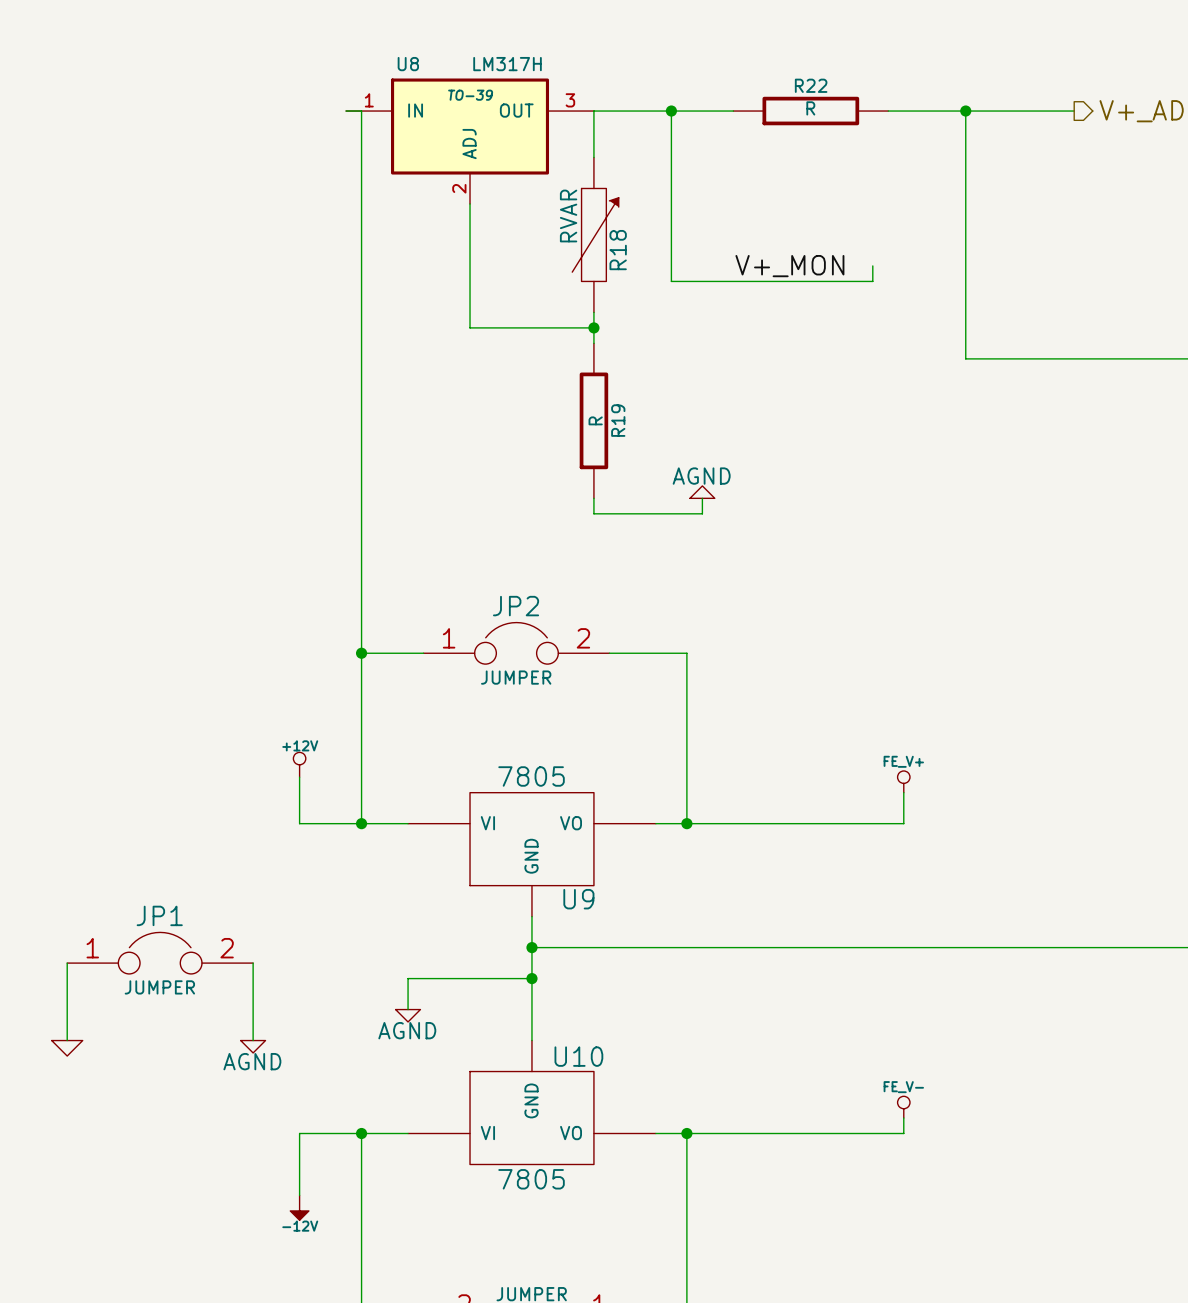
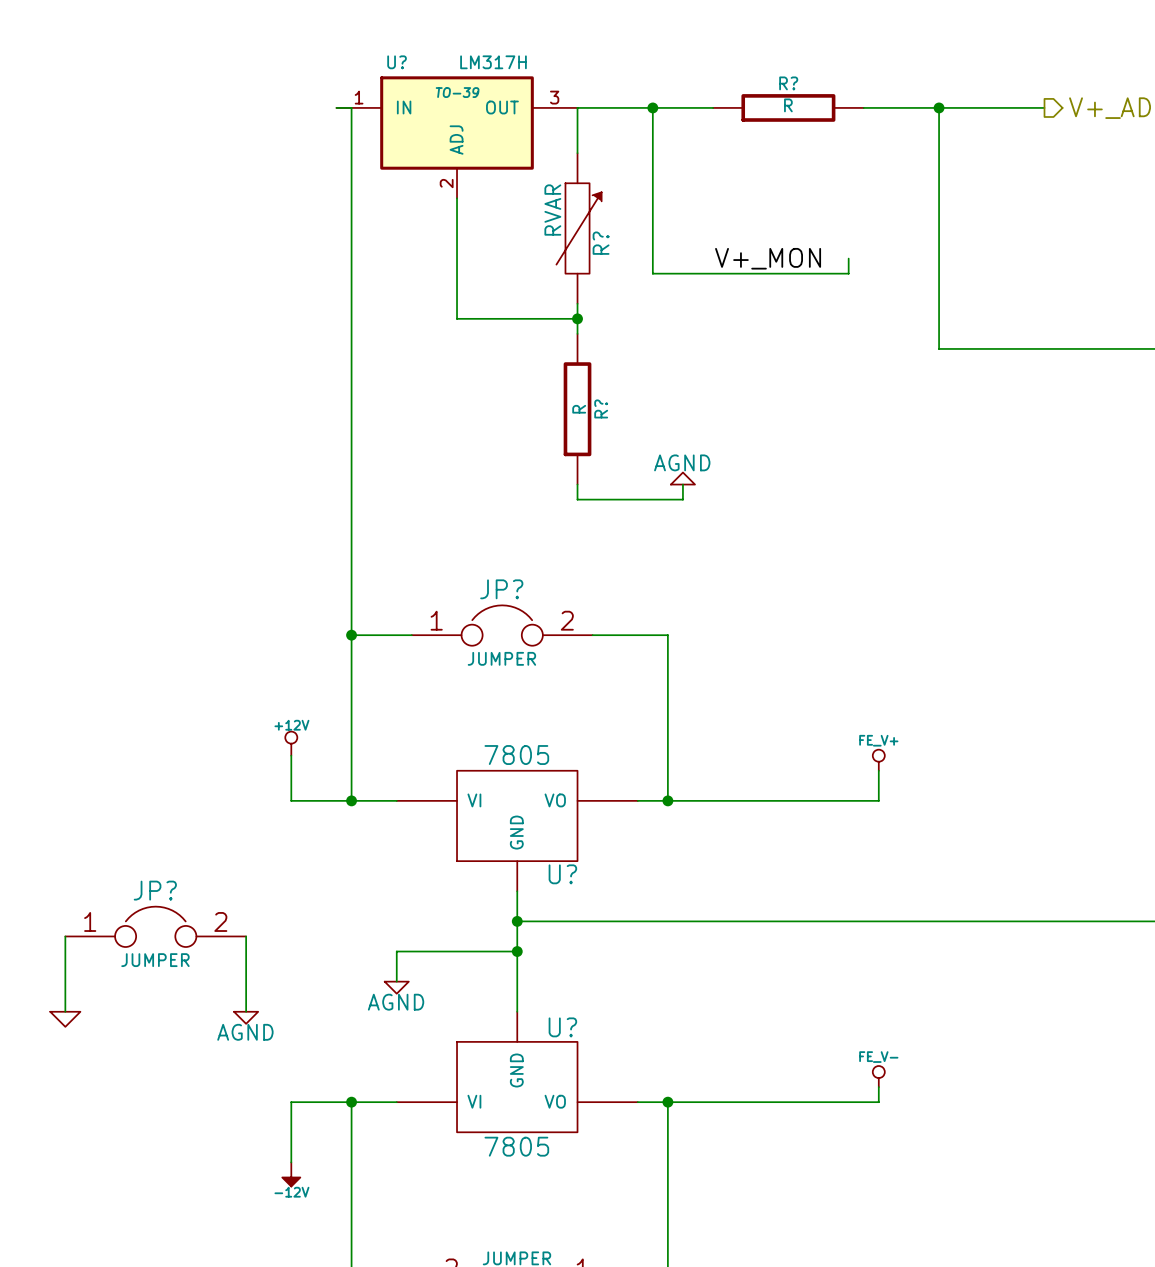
U8 name: U8 (408, 64) -> U? (397, 62)
R22 name: R22 (811, 85) -> R? (788, 83)
R18 name: R18 (618, 250) -> R? (601, 243)
R19 name: R19 (618, 420) -> R? (601, 408)
JP2 name: JP2 (516, 606) -> JP? (501, 589)
U9 name: U9 (578, 899) -> U? (562, 874)
JP1 name: JP1 (159, 915) -> JP? (155, 890)
U10 name: U10 (578, 1056) -> U? (562, 1027)

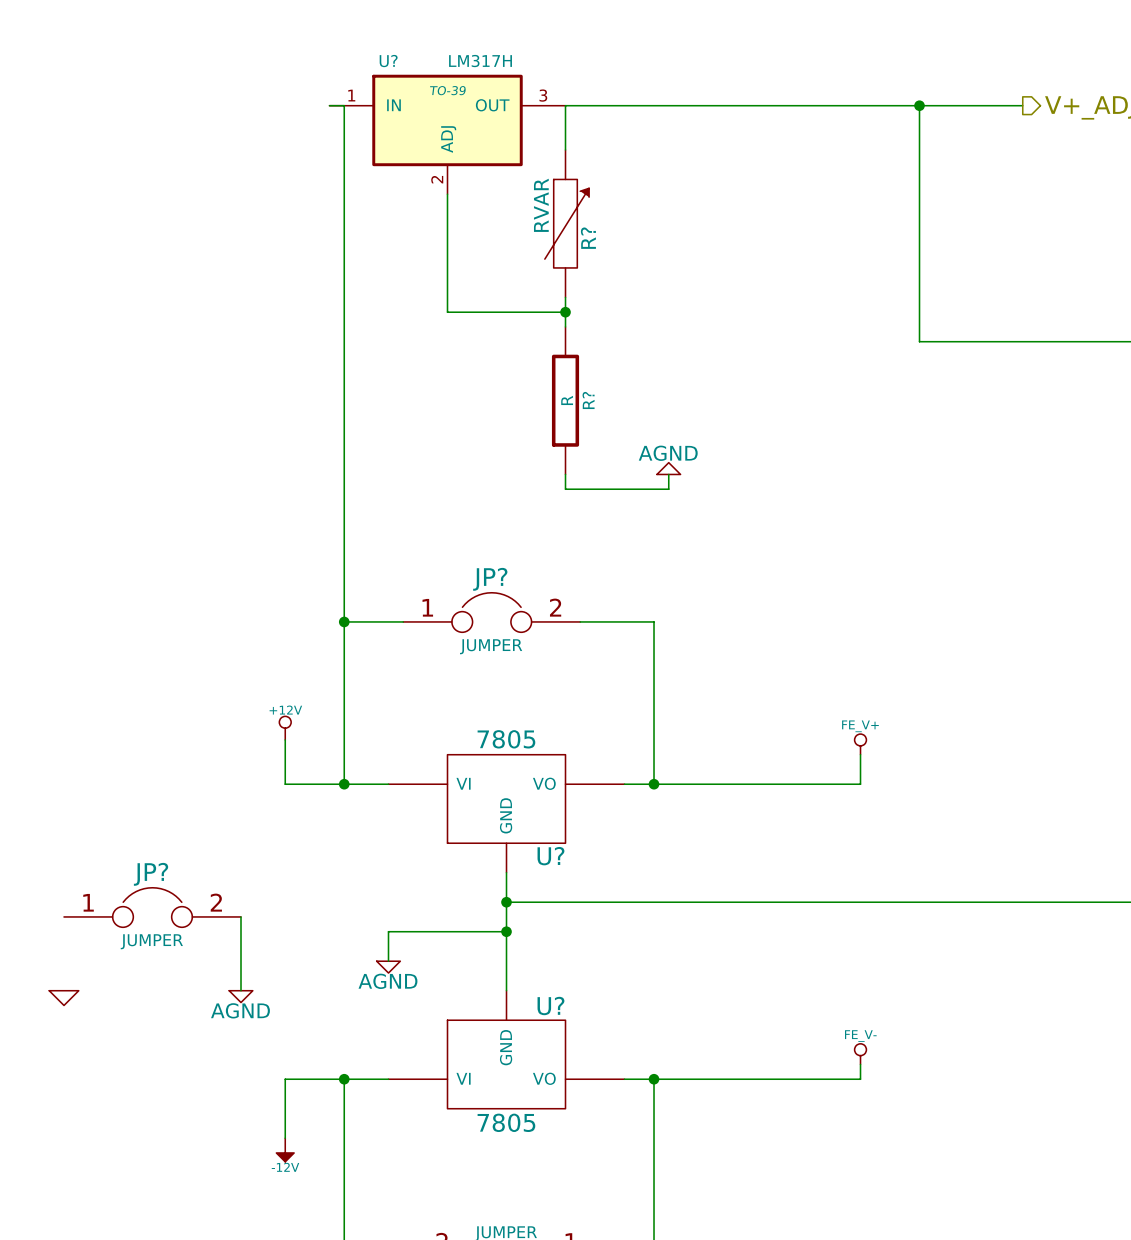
wire: (652, 107) (652, 273) (848, 273) (848, 258) -> none
junction: (652, 107) -> none
wire: none -> (698, 105) (845, 105)
R?: R (788, 107) -> none
label: V+_MON (768, 258) -> none
wire: (65, 936) (65, 1011) -> none

